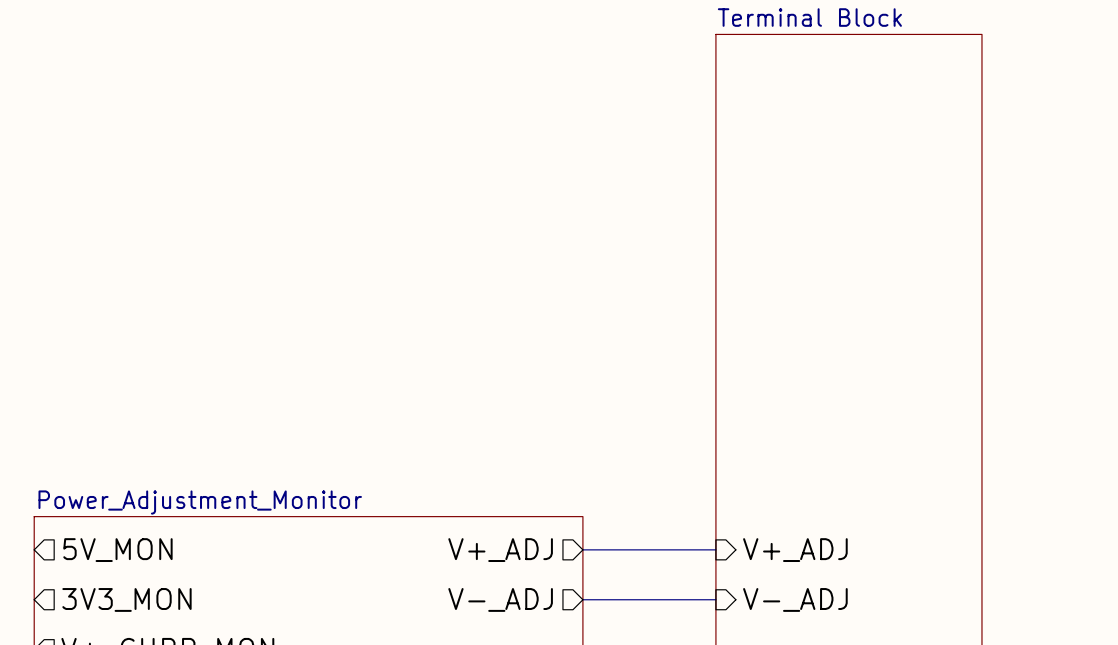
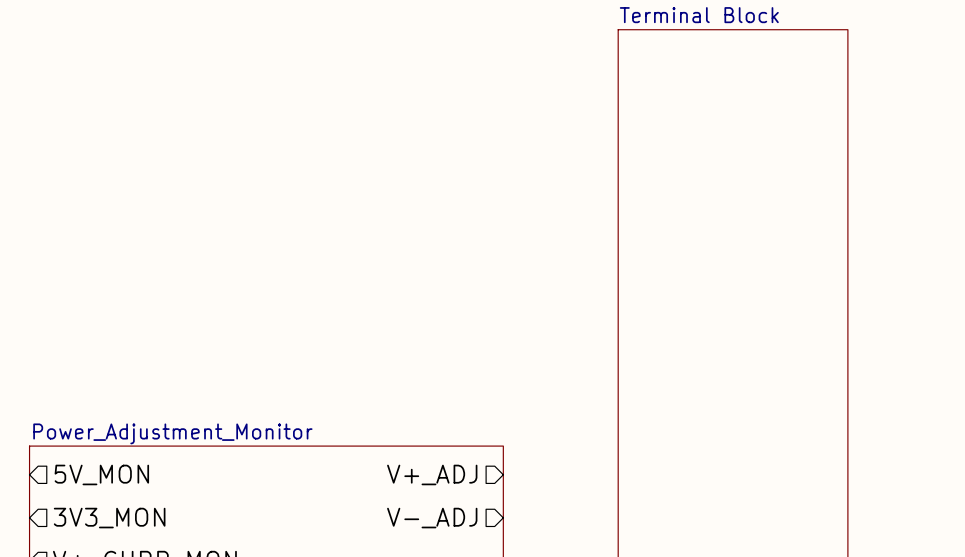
wire: (582, 549) (715, 549) -> none
sheet pin: V+_ADJ (795, 550) -> none
wire: (582, 599) (715, 599) -> none
sheet pin: V-_ADJ (795, 599) -> none

